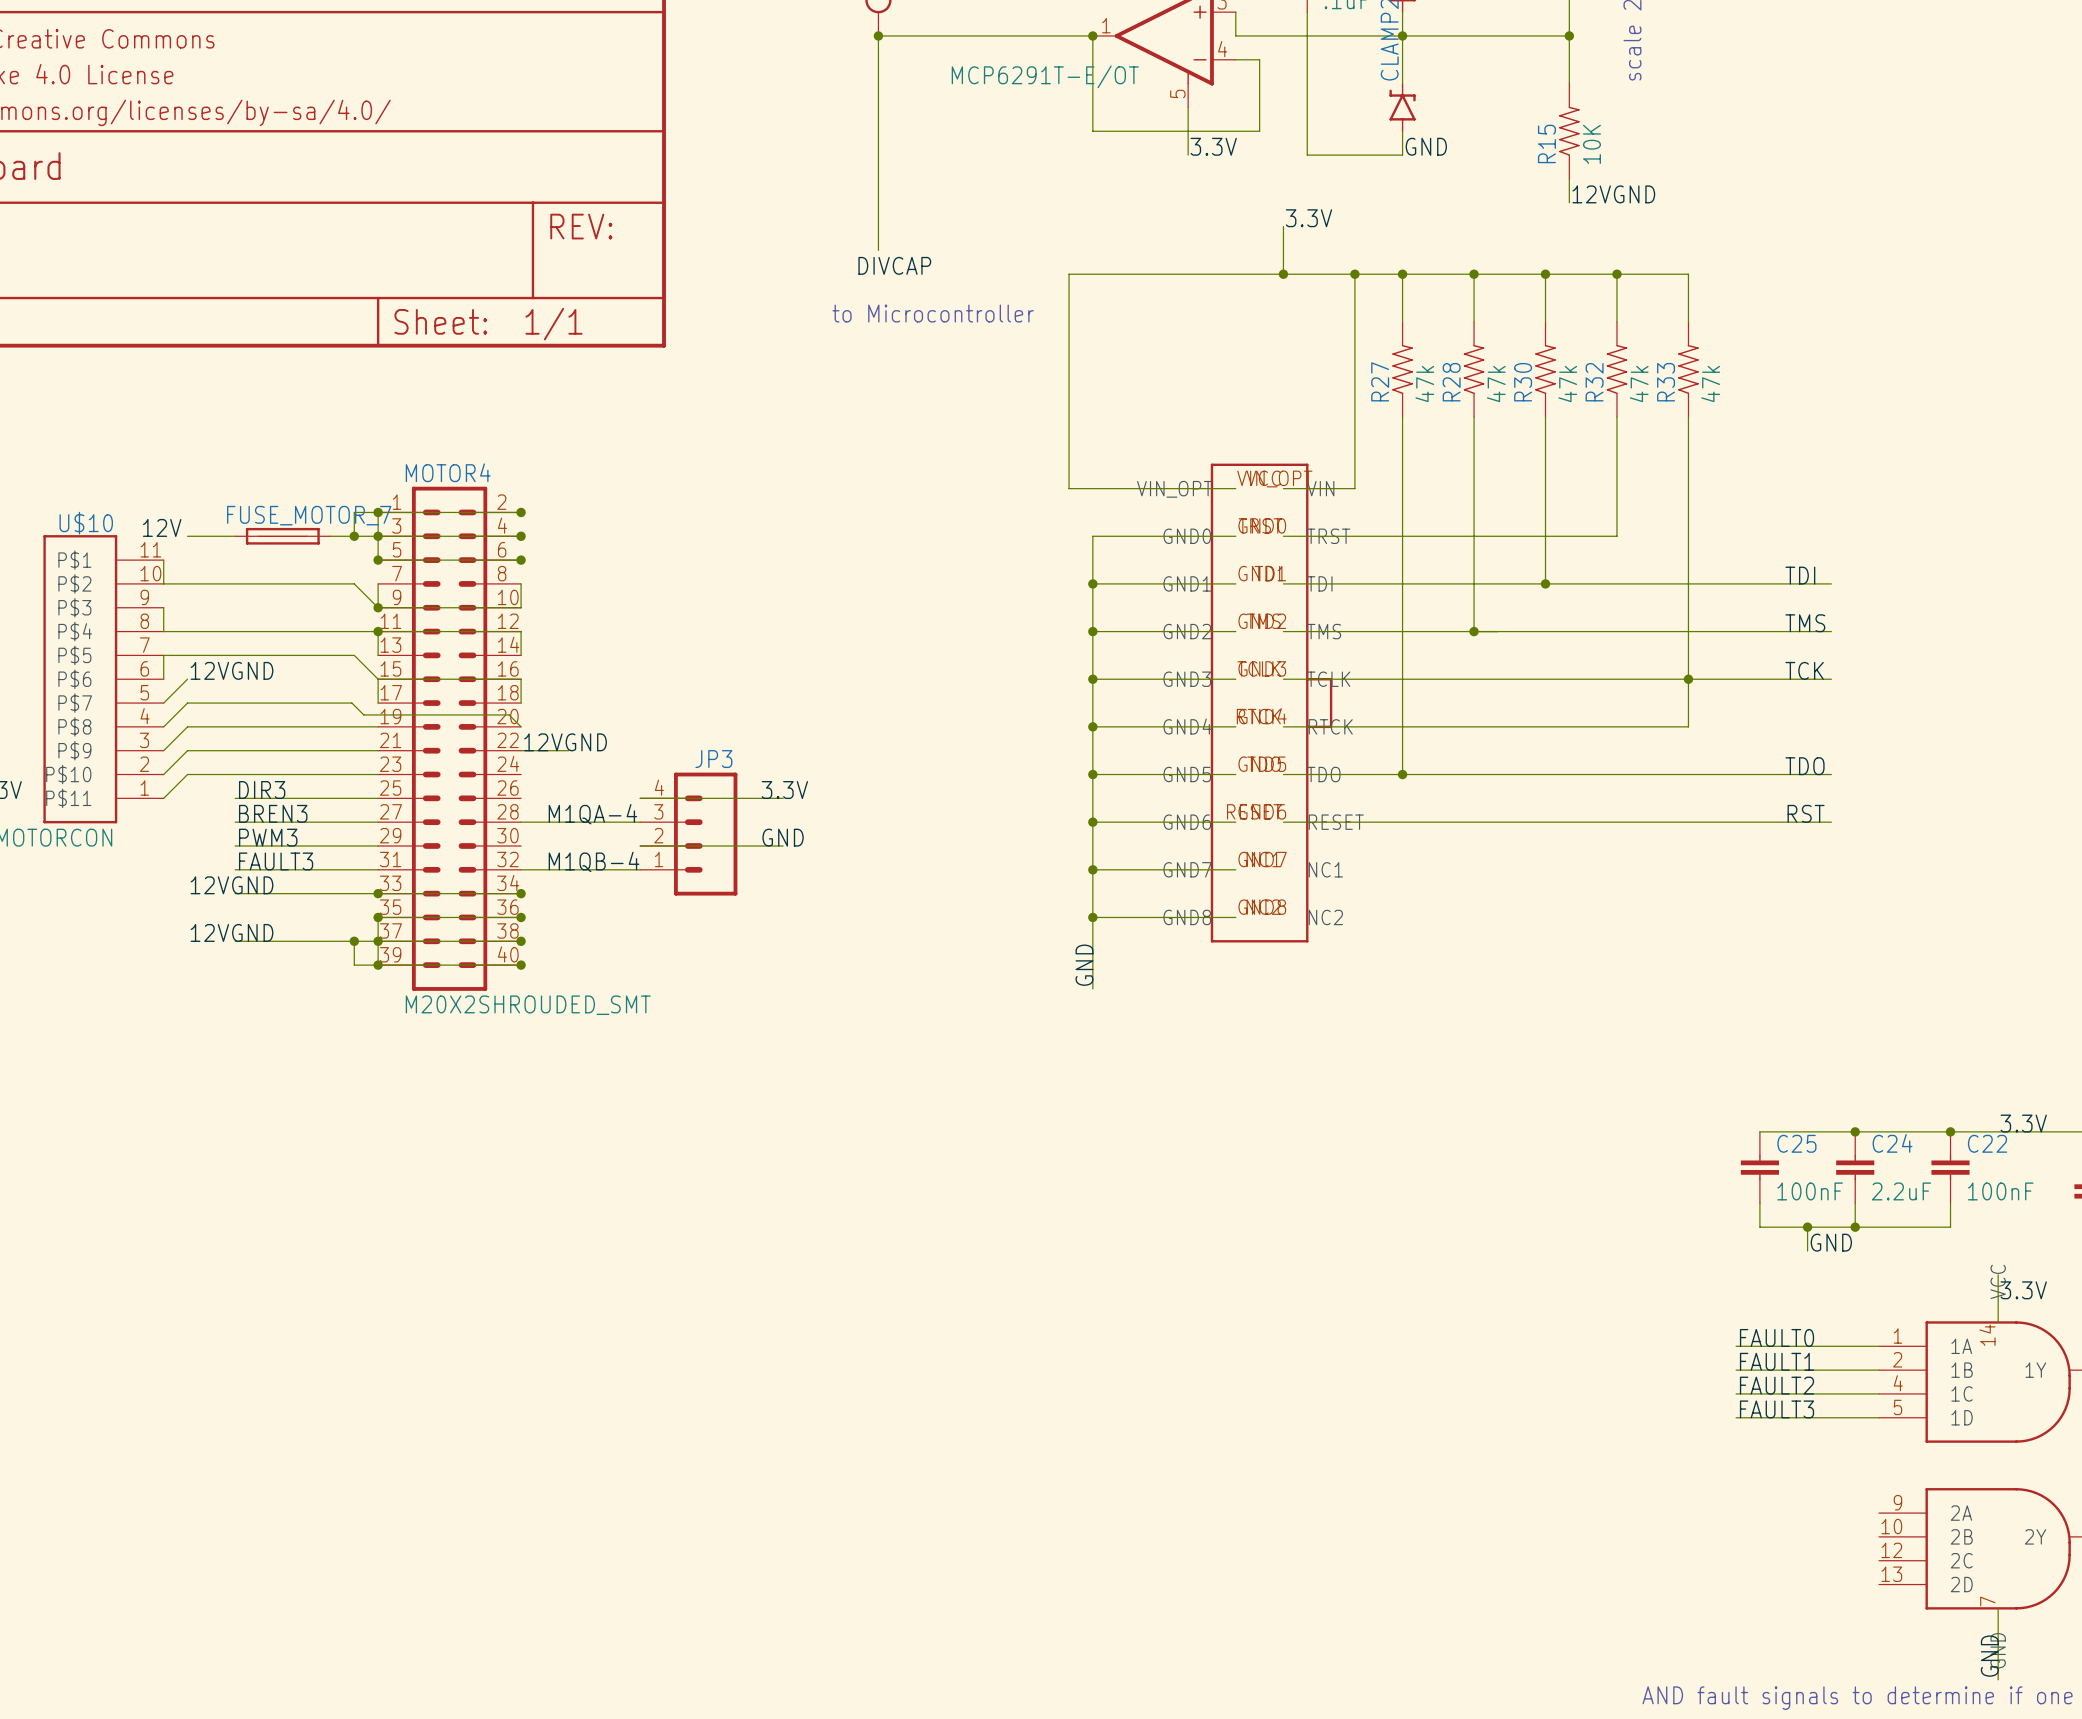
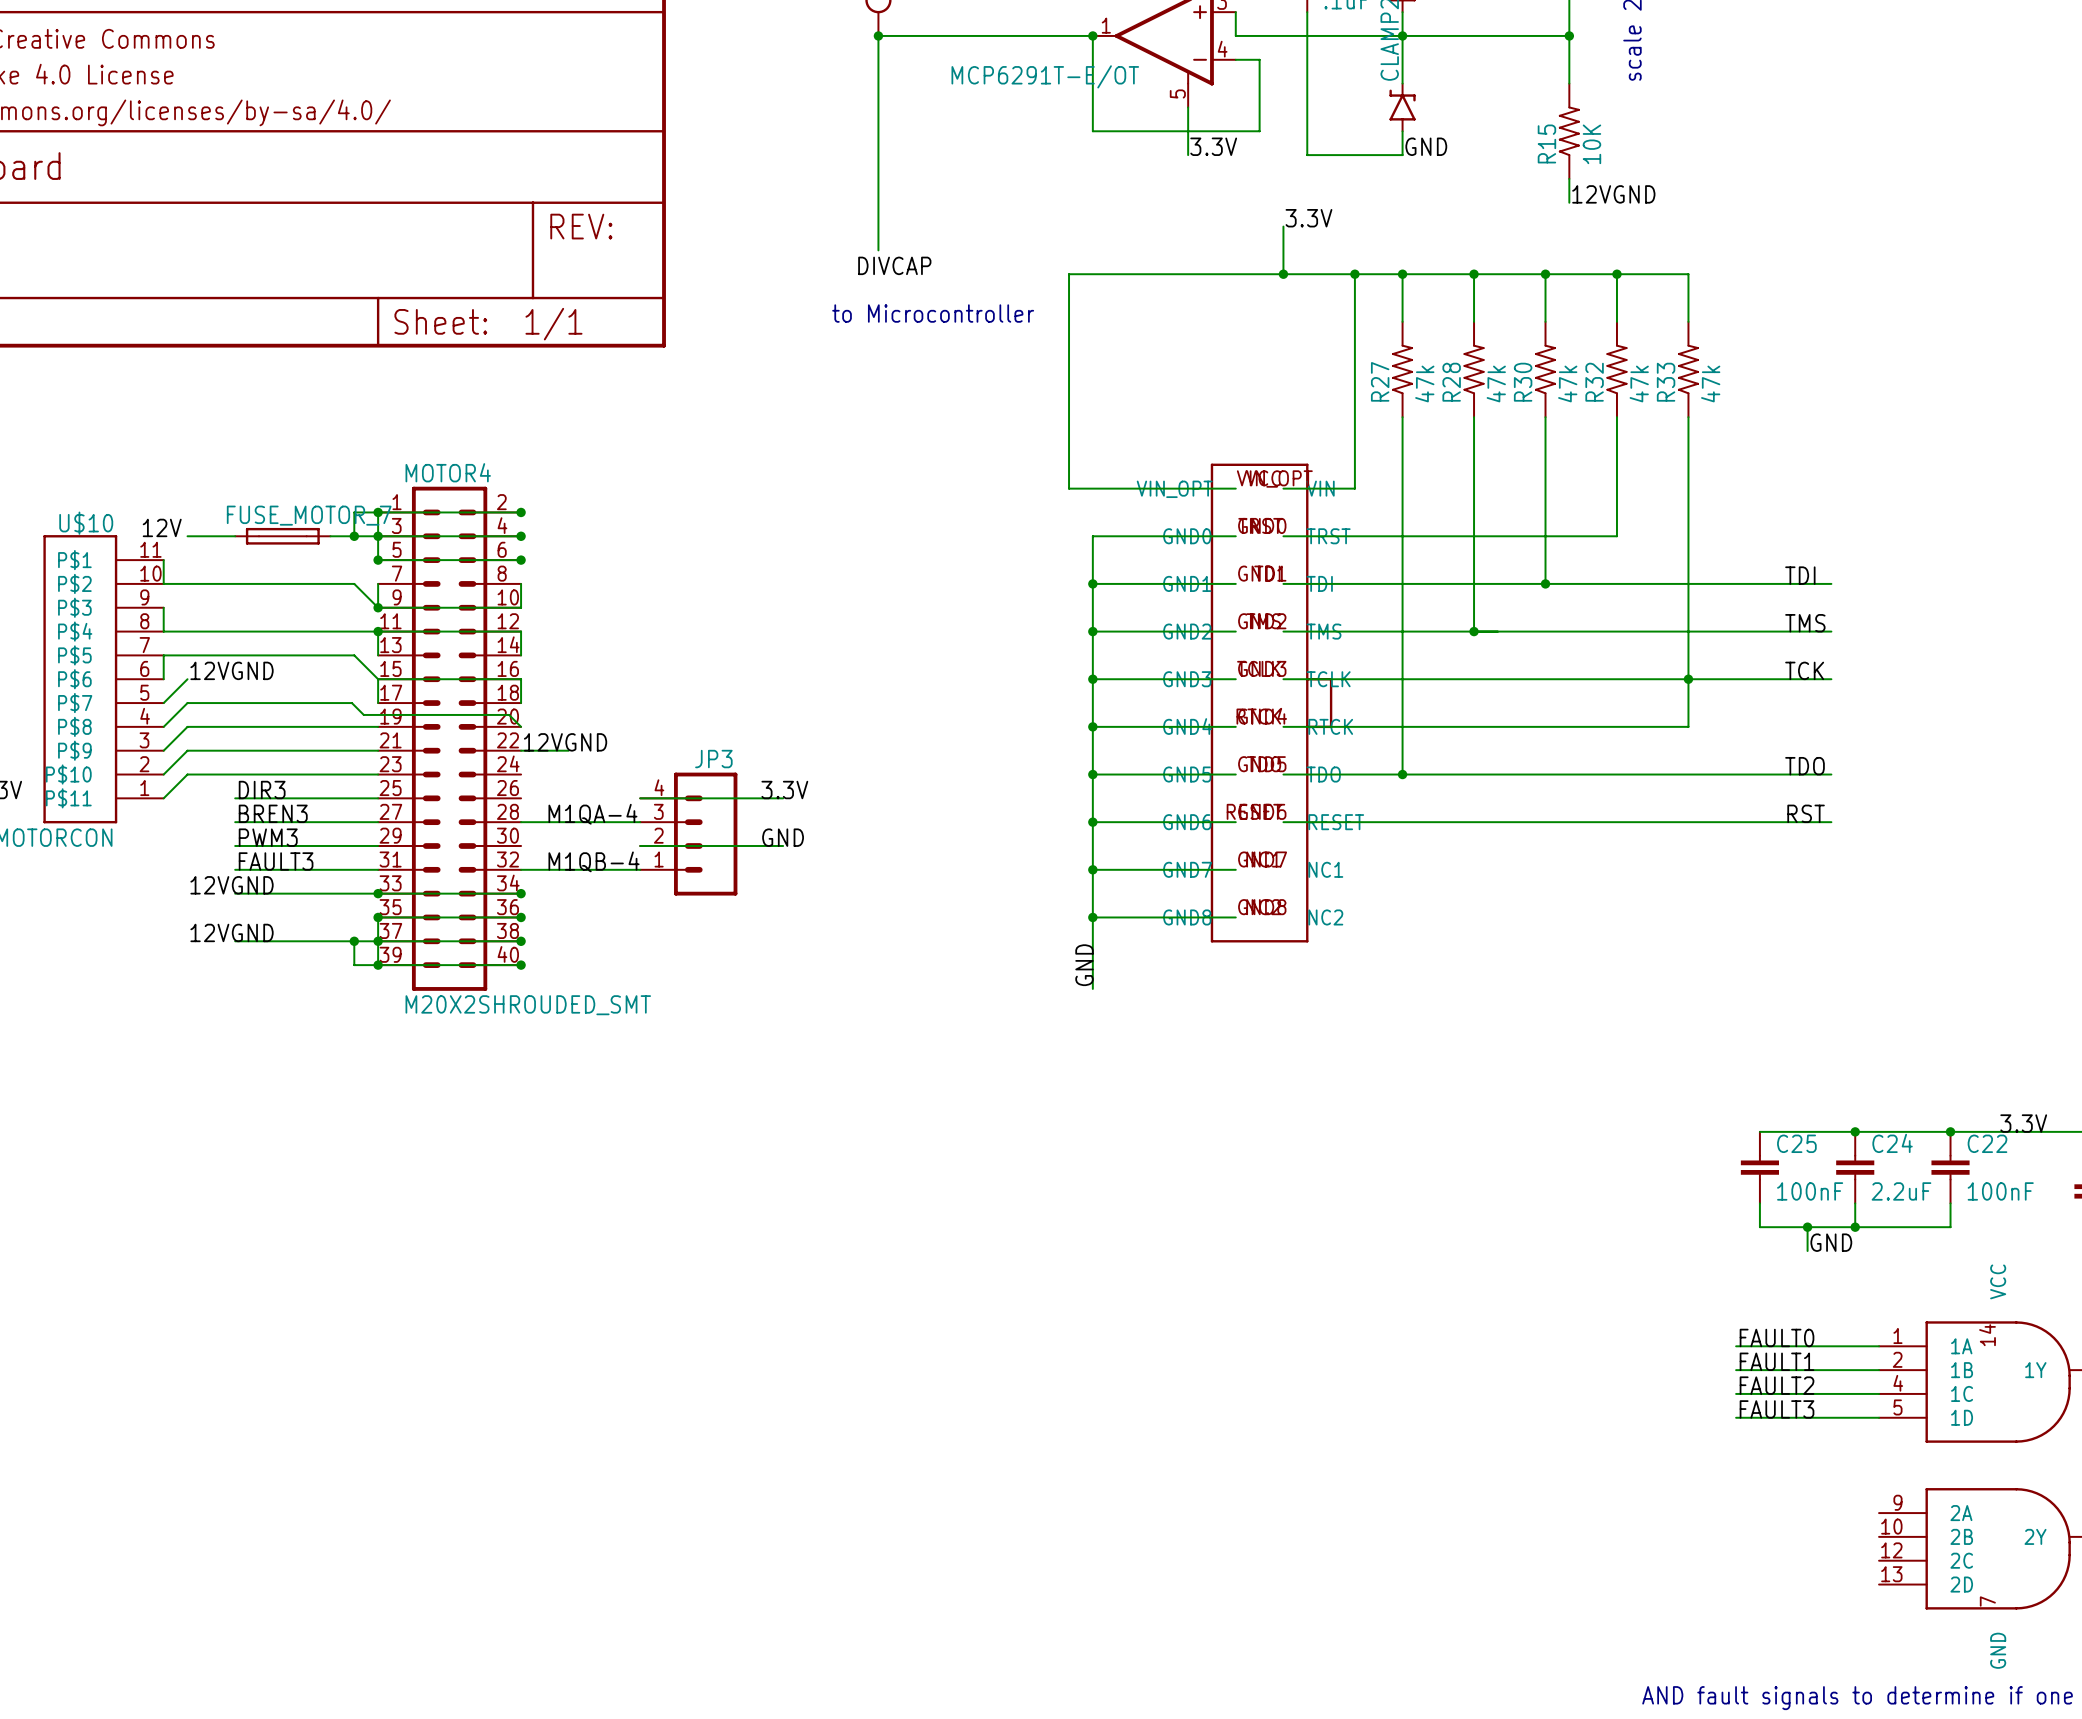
wire: (1998, 1274) (1998, 1322) -> none
label: 3.3V (2023, 1290) -> none
wire: (1998, 1608) (1998, 1679) -> none
label: GND (1989, 1656) -> none

